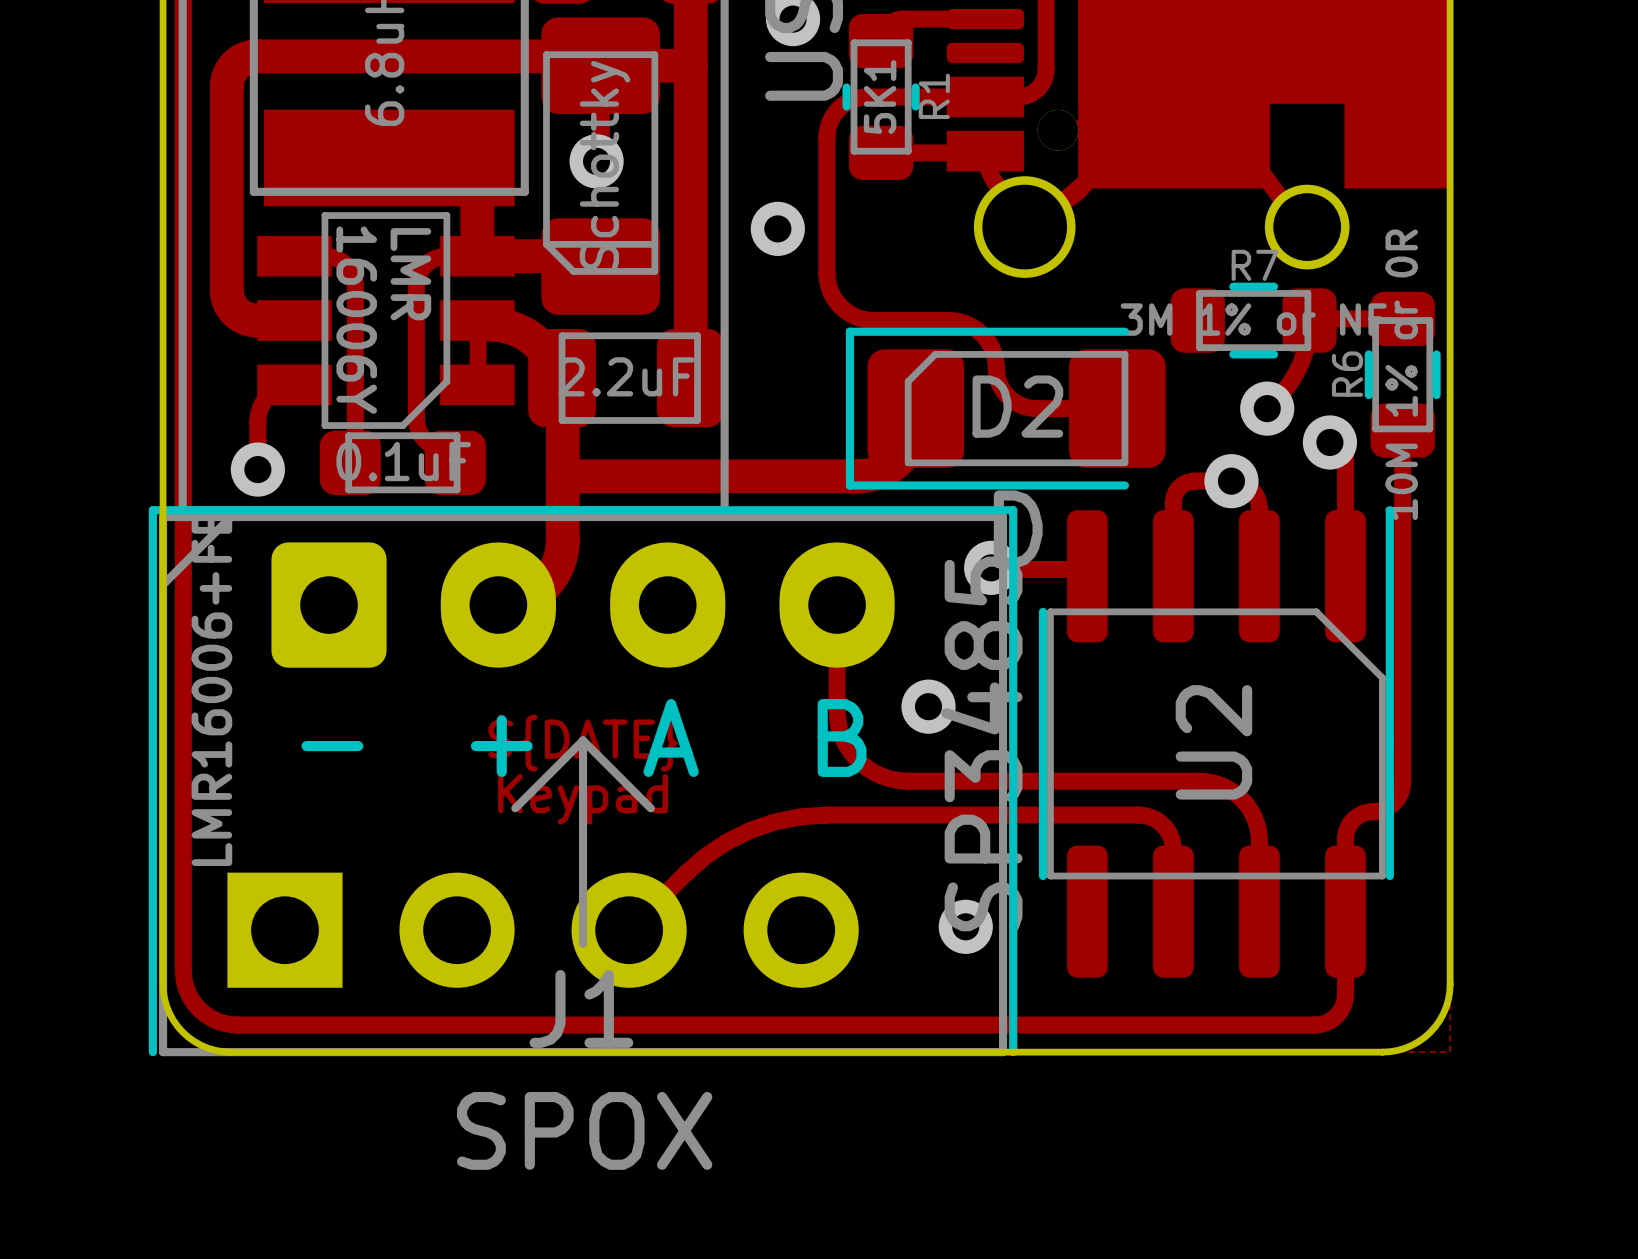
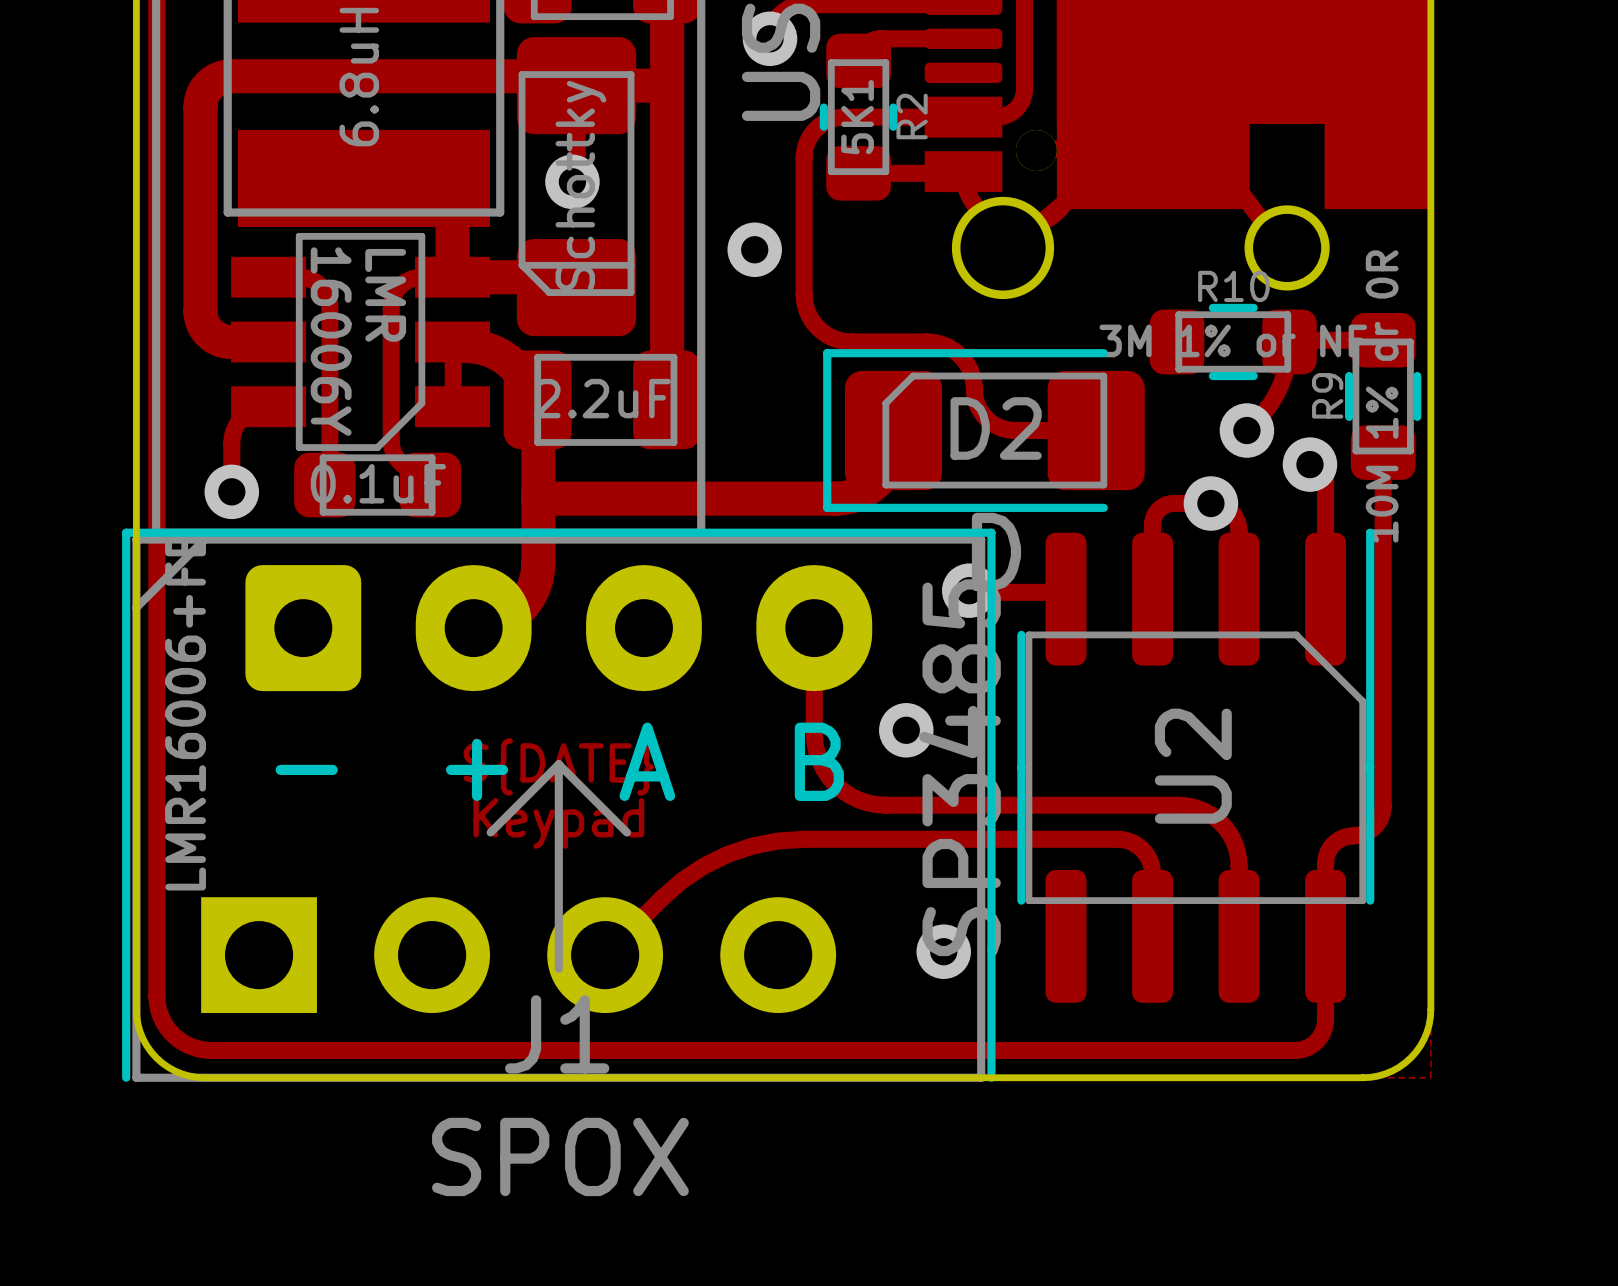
R1 name: R1 (934, 96) -> R2 (912, 116)
R7 name: R7 (1254, 265) -> R10 (1233, 286)
R6 name: R6 (1347, 374) -> R9 (1327, 395)

